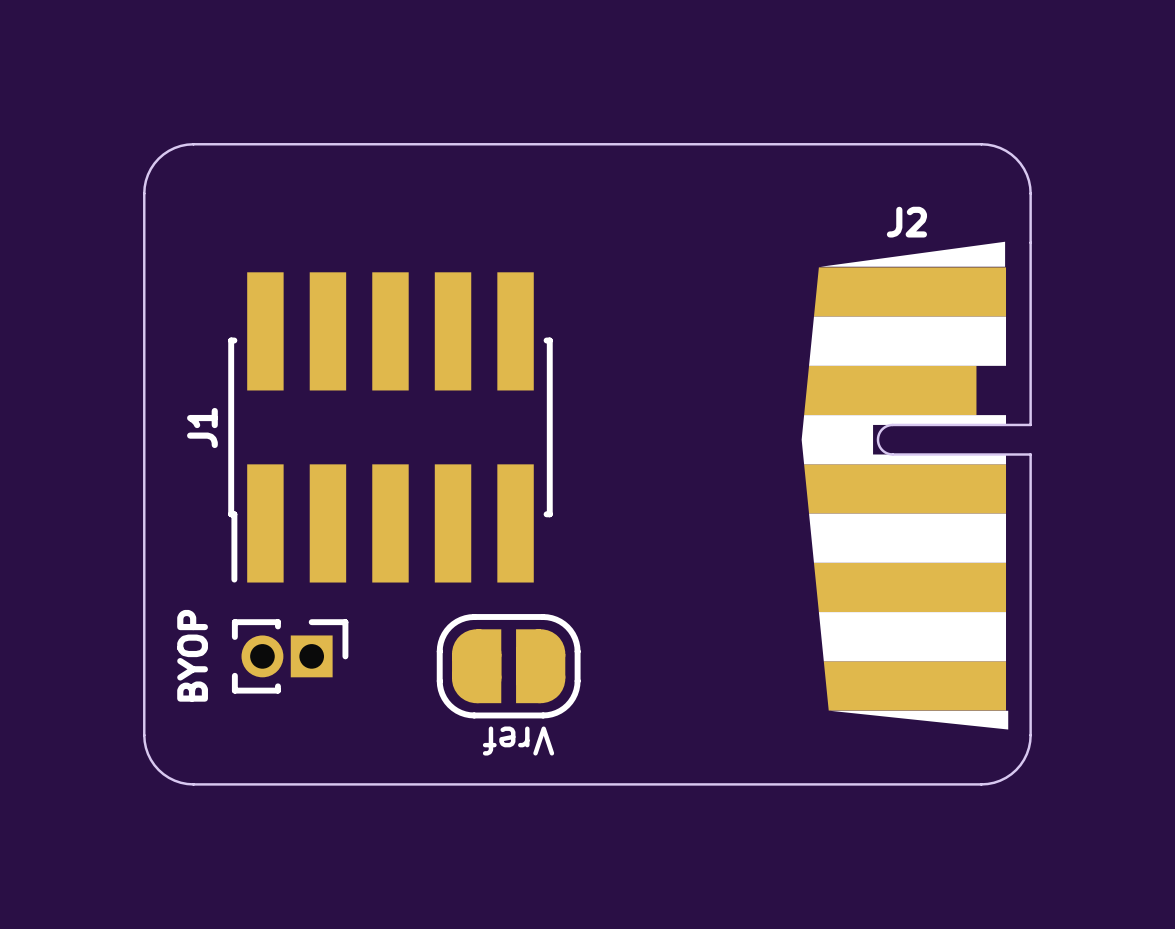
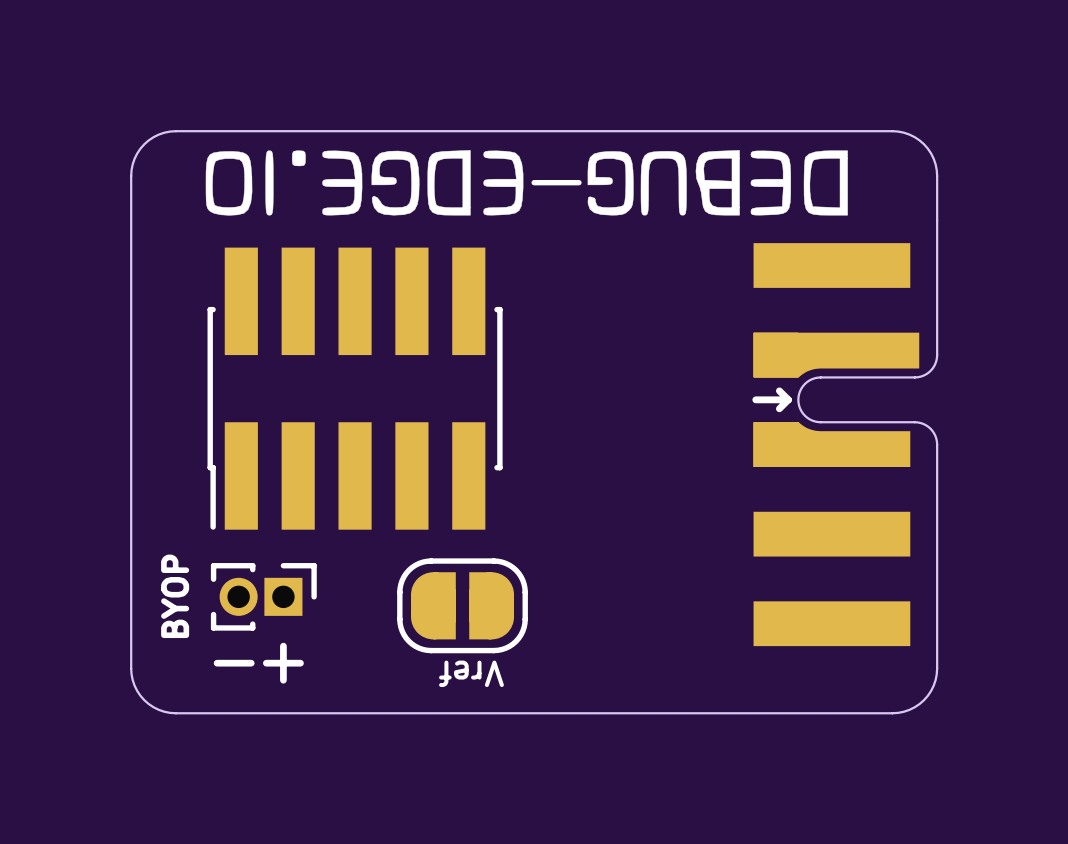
drawing: none -> [205, 150, 848, 216]
drawing: [820, 241, 1006, 267] -> none
J1 name: J1 (202, 428) -> none
J2: (916, 488) -> none
part: none -> (845, 444)
drawing: [829, 710, 1009, 730] -> none
text: none -> - (234, 663)
text: none -> + (283, 663)

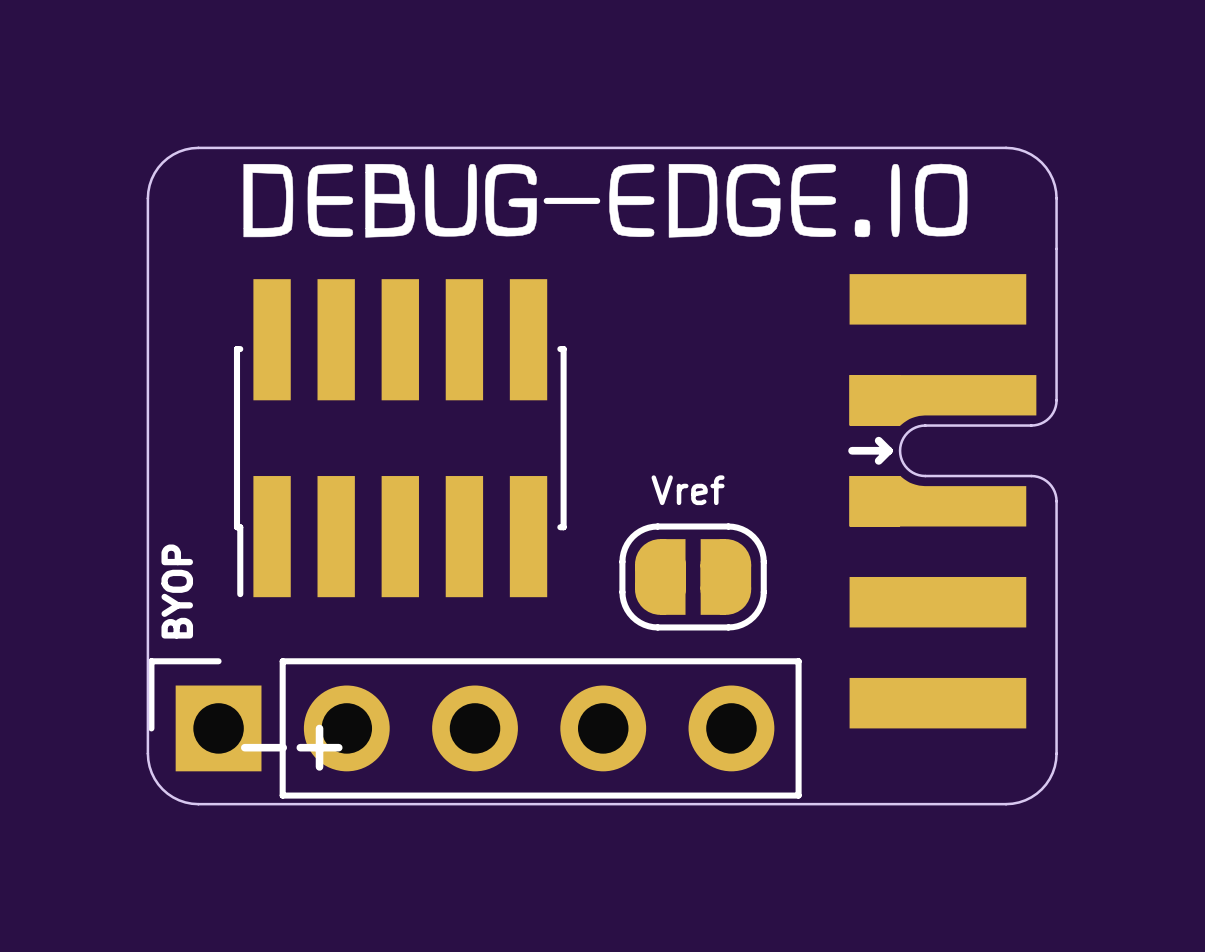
drawing shape: [205, 150, 848, 216] -> [243, 163, 968, 238]
text position: BYOP (175, 596) -> BYOP (177, 591)
part: (263, 596) -> none
part position: (462, 605) -> (693, 576)
part: none -> (475, 728)
text rotation: 0° (471, 673) -> 180° (688, 490)
text position: Vref (471, 673) -> Vref (688, 490)

